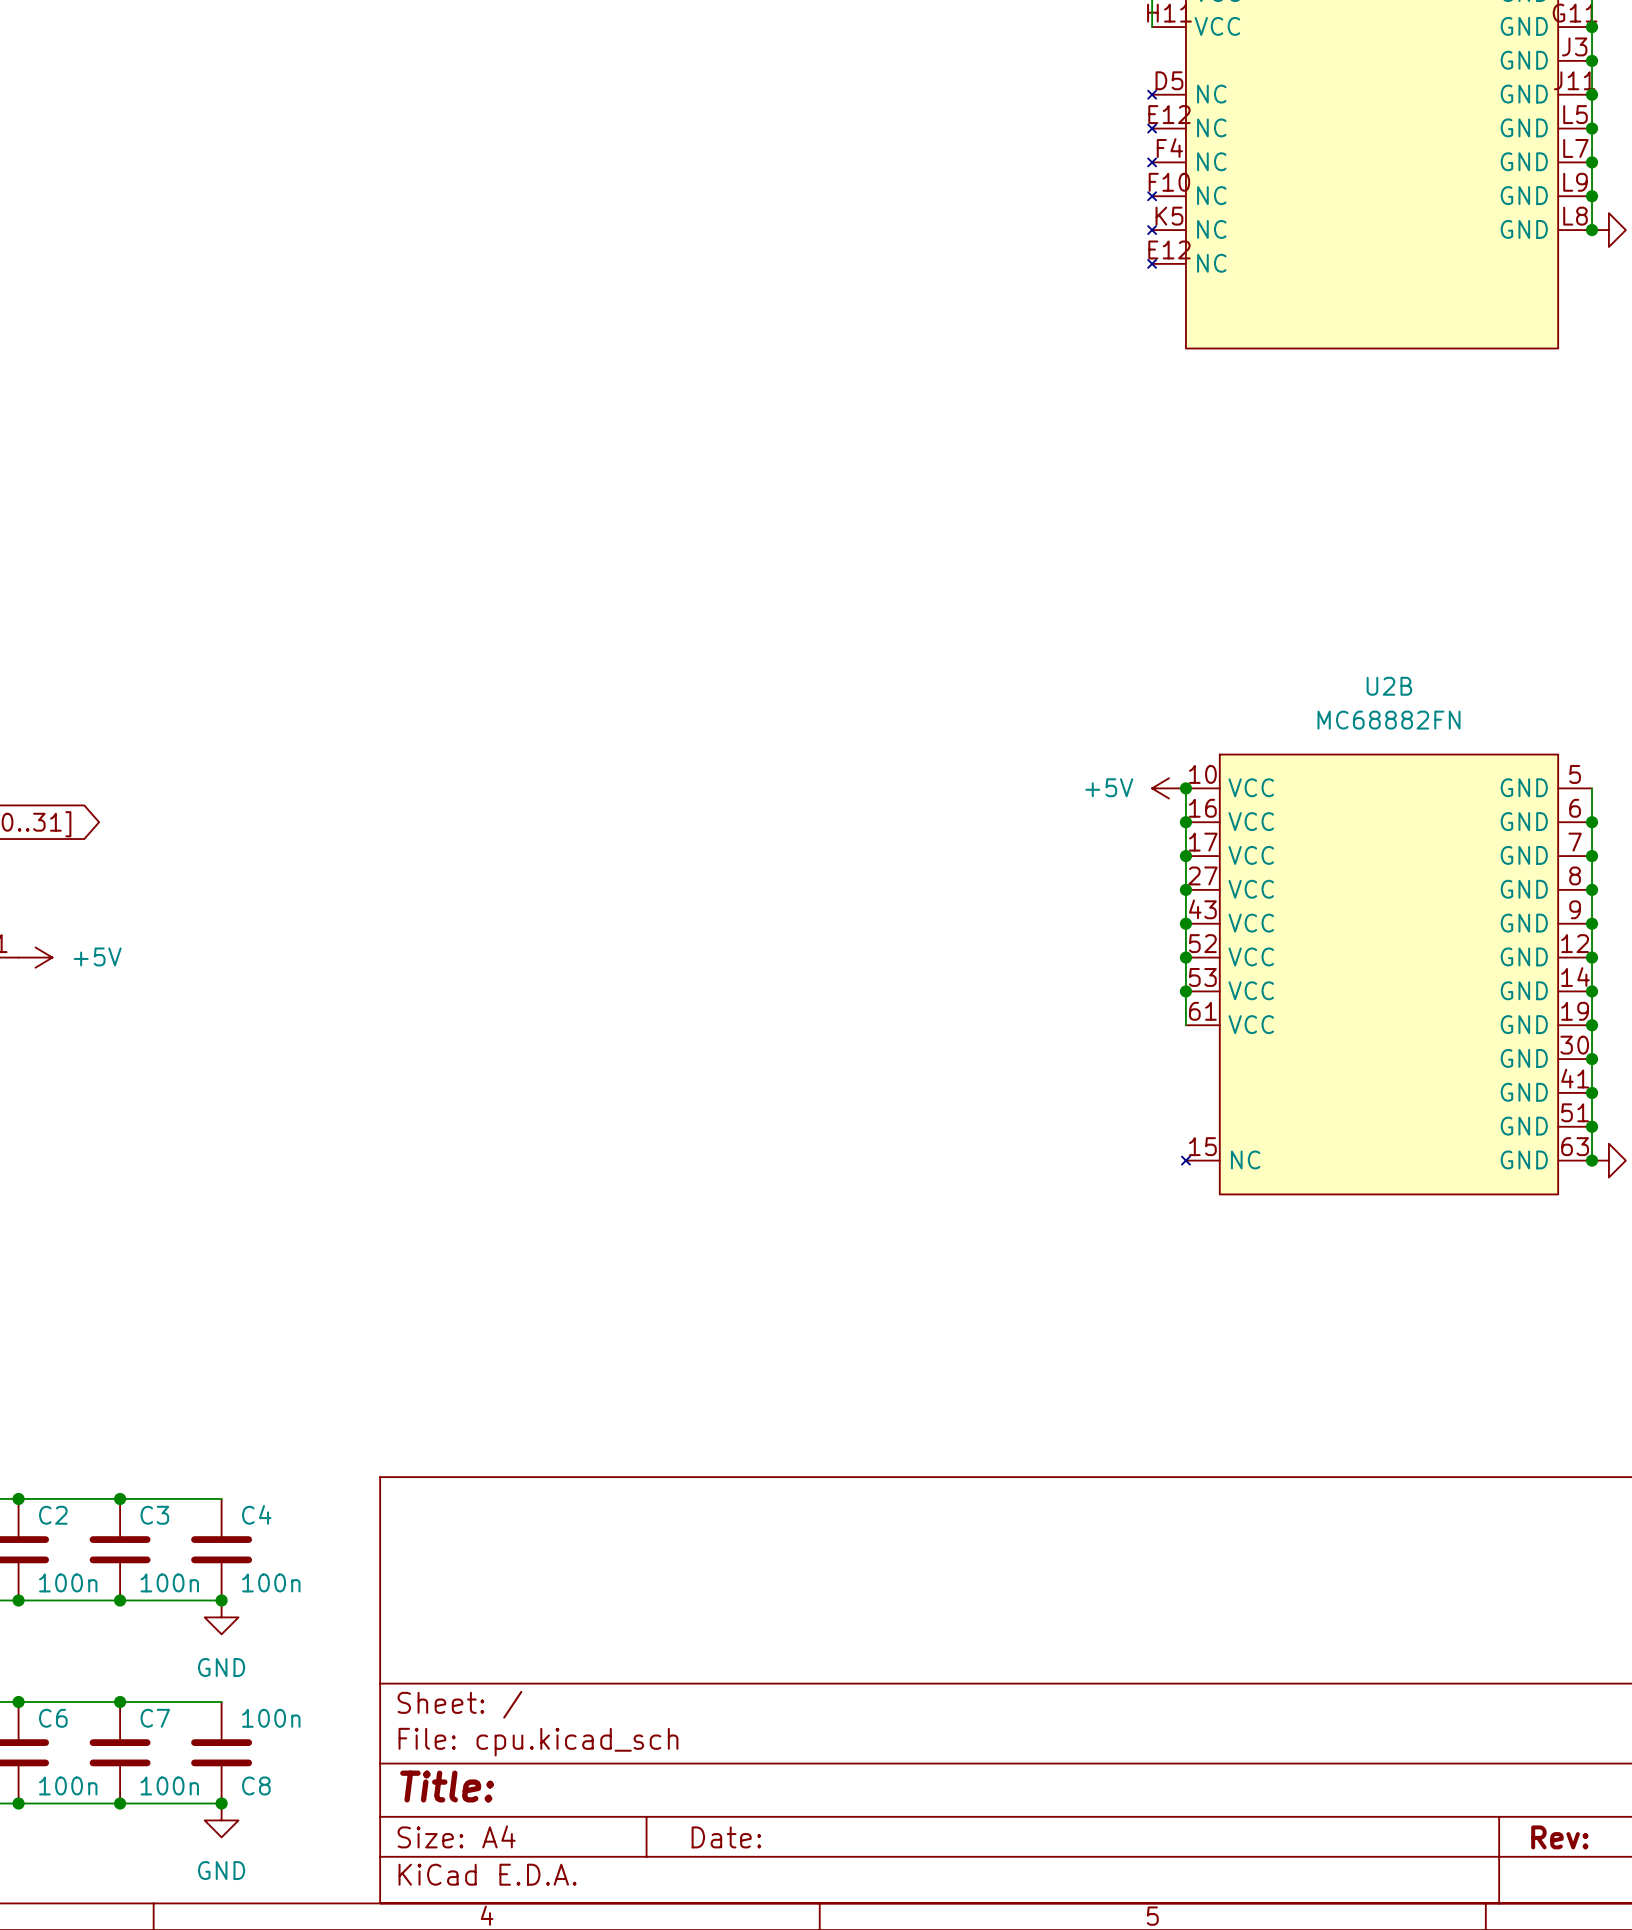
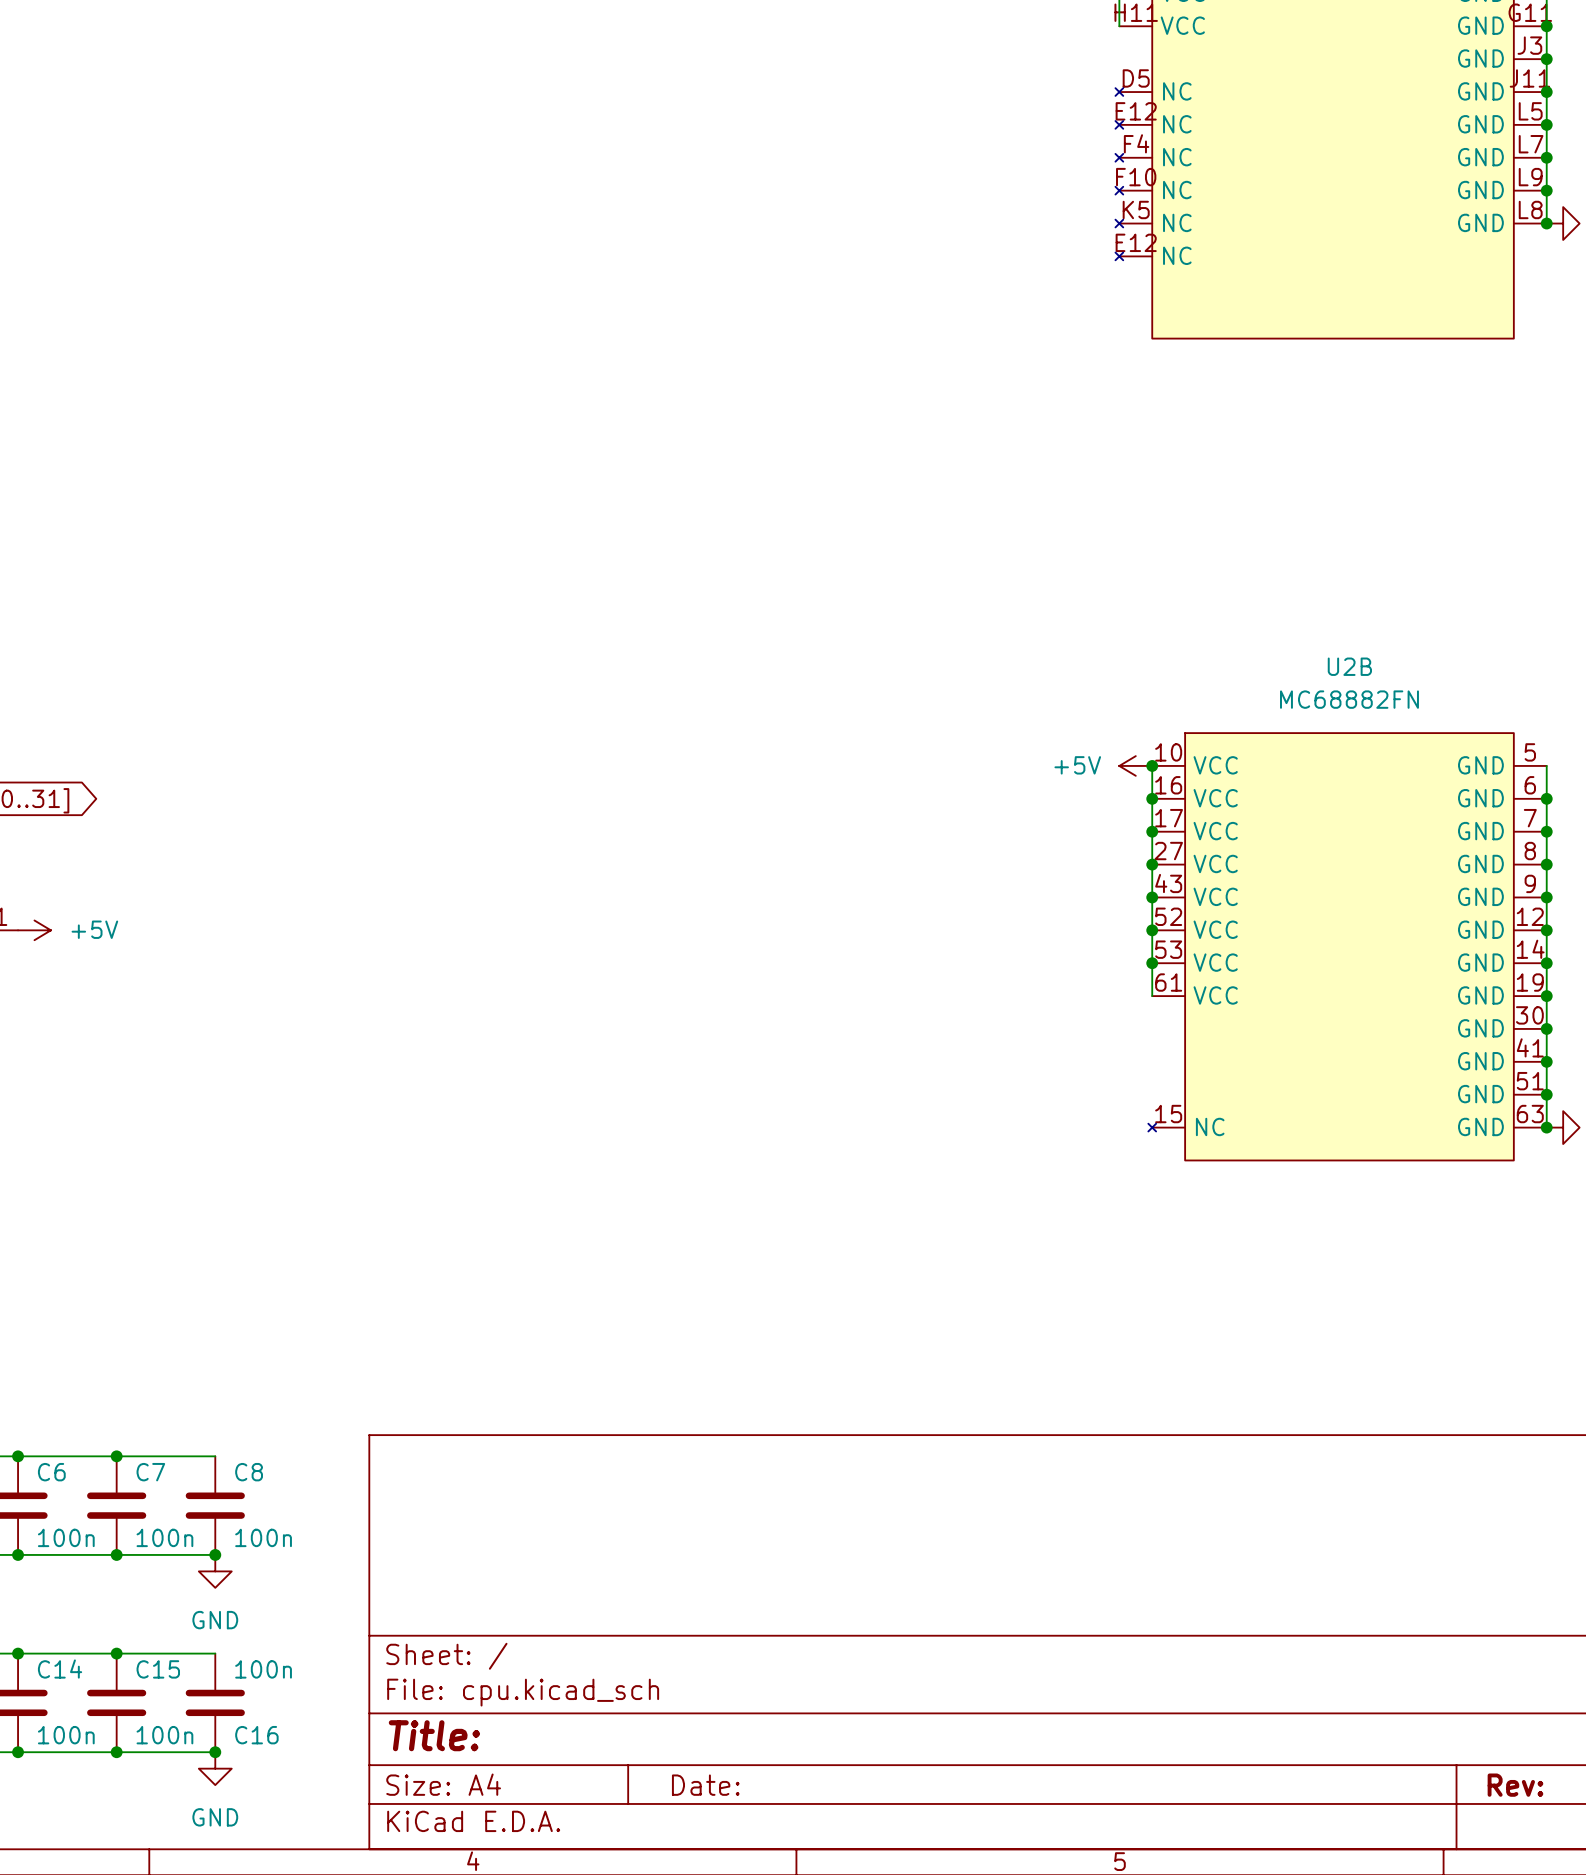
C4 name: C4 (256, 1514) -> C8 (249, 1472)
C2 name: C2 (53, 1515) -> C6 (51, 1472)
C3 name: C3 (154, 1515) -> C7 (150, 1472)
C6 name: C6 (53, 1718) -> C14 (60, 1669)
C7 name: C7 (155, 1718) -> C15 (158, 1669)
C8 name: C8 (256, 1785) -> C16 (256, 1735)

